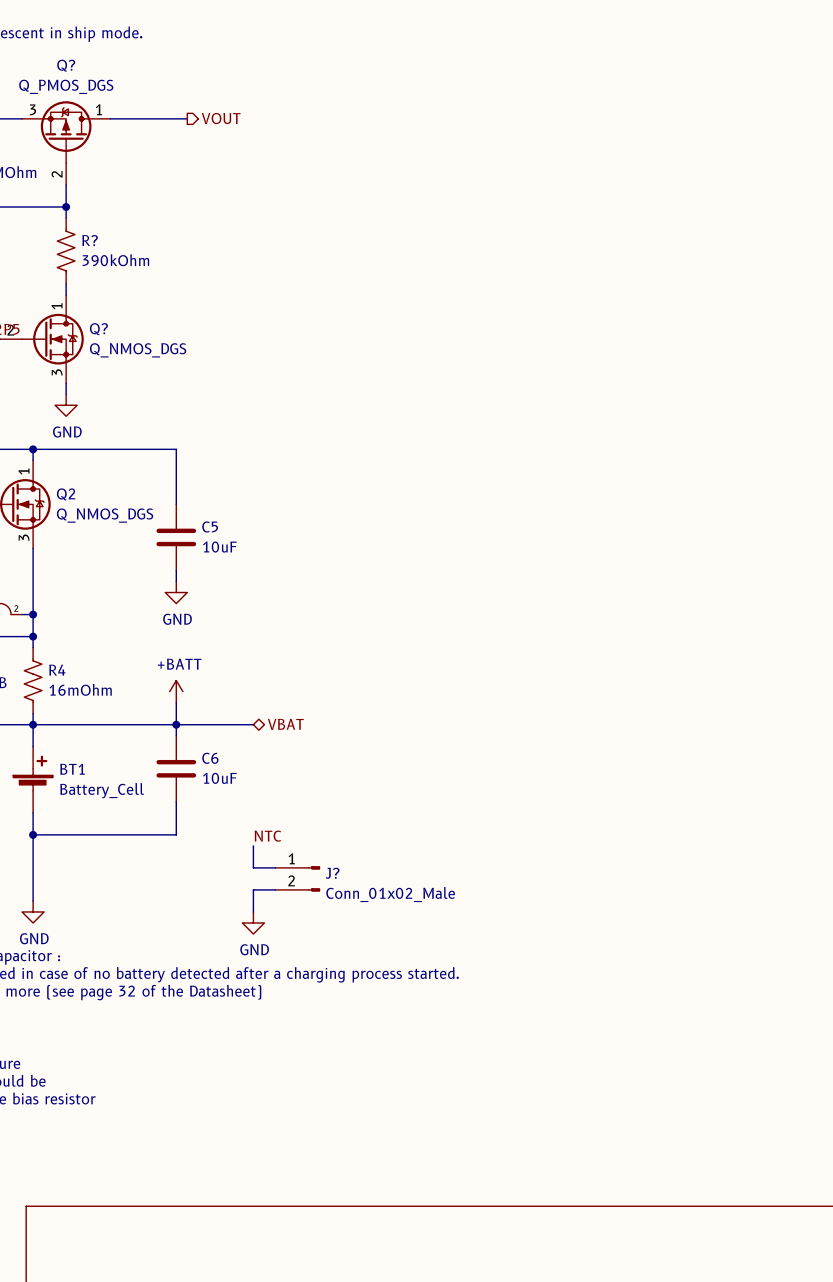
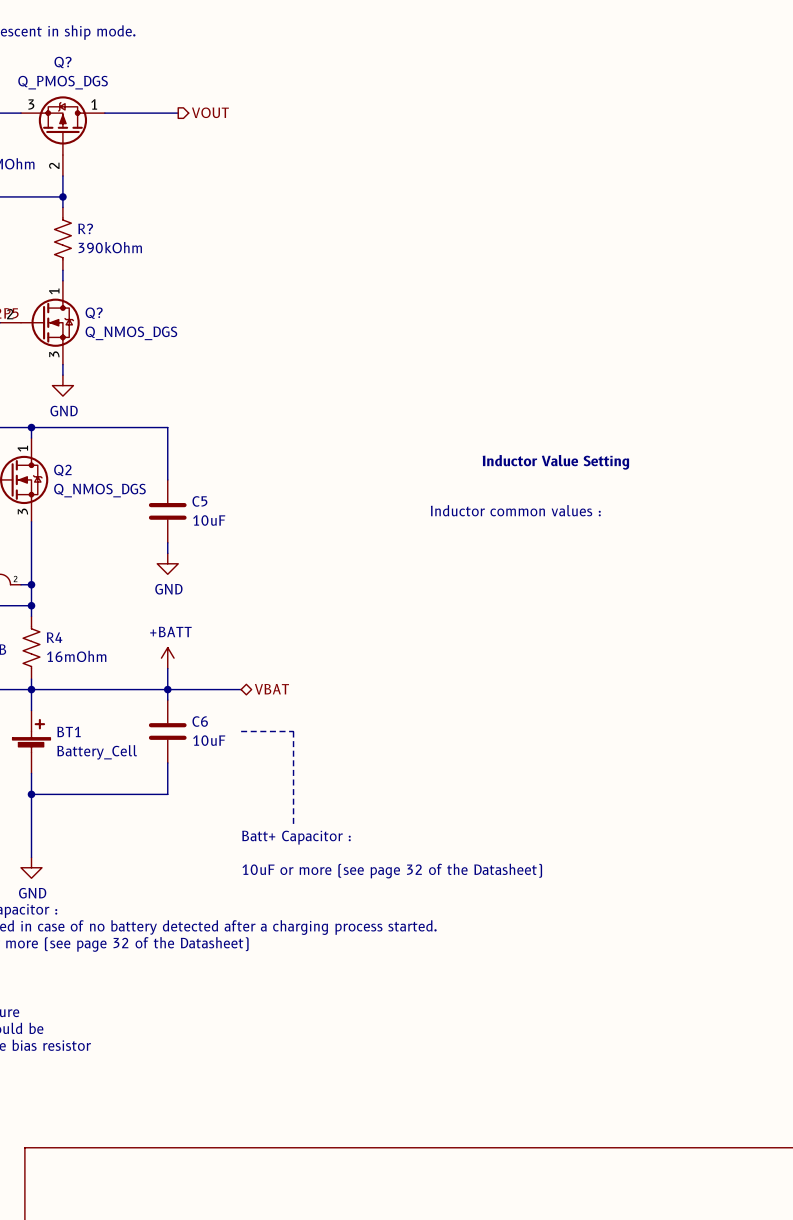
text: none -> Inductor Value Setting (555, 462)
text: none -> Inductor common values : (515, 510)
line: none -> (241, 731) (293, 731) (293, 825)
label: NTC (267, 836) -> none
wire: (253, 845) (253, 867) (275, 867) -> none
J?: Conn_01x02_Male (297, 878) -> none
text: none -> Batt+ Capacitor : (296, 837)
wire: (275, 889) (253, 889) (253, 911) -> none
text: none -> 10uF or more (see page 32 of the Datasheet) (392, 871)
power symbol: GND (253, 923) -> none

